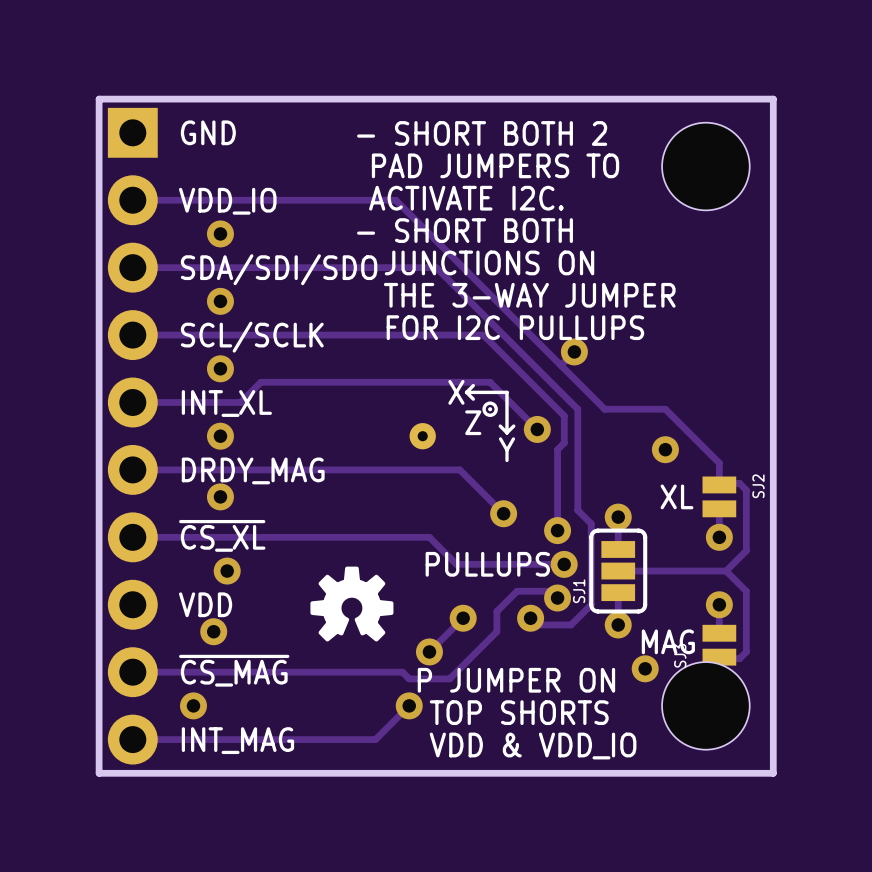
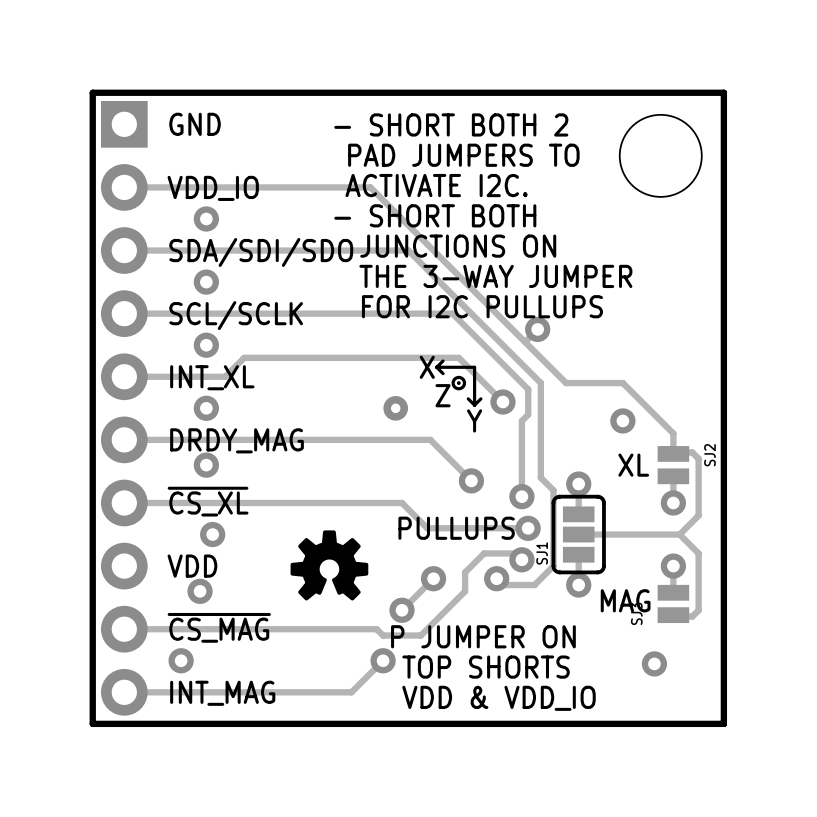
via position: (645, 668) -> (654, 663)
part: (705, 705) -> none

